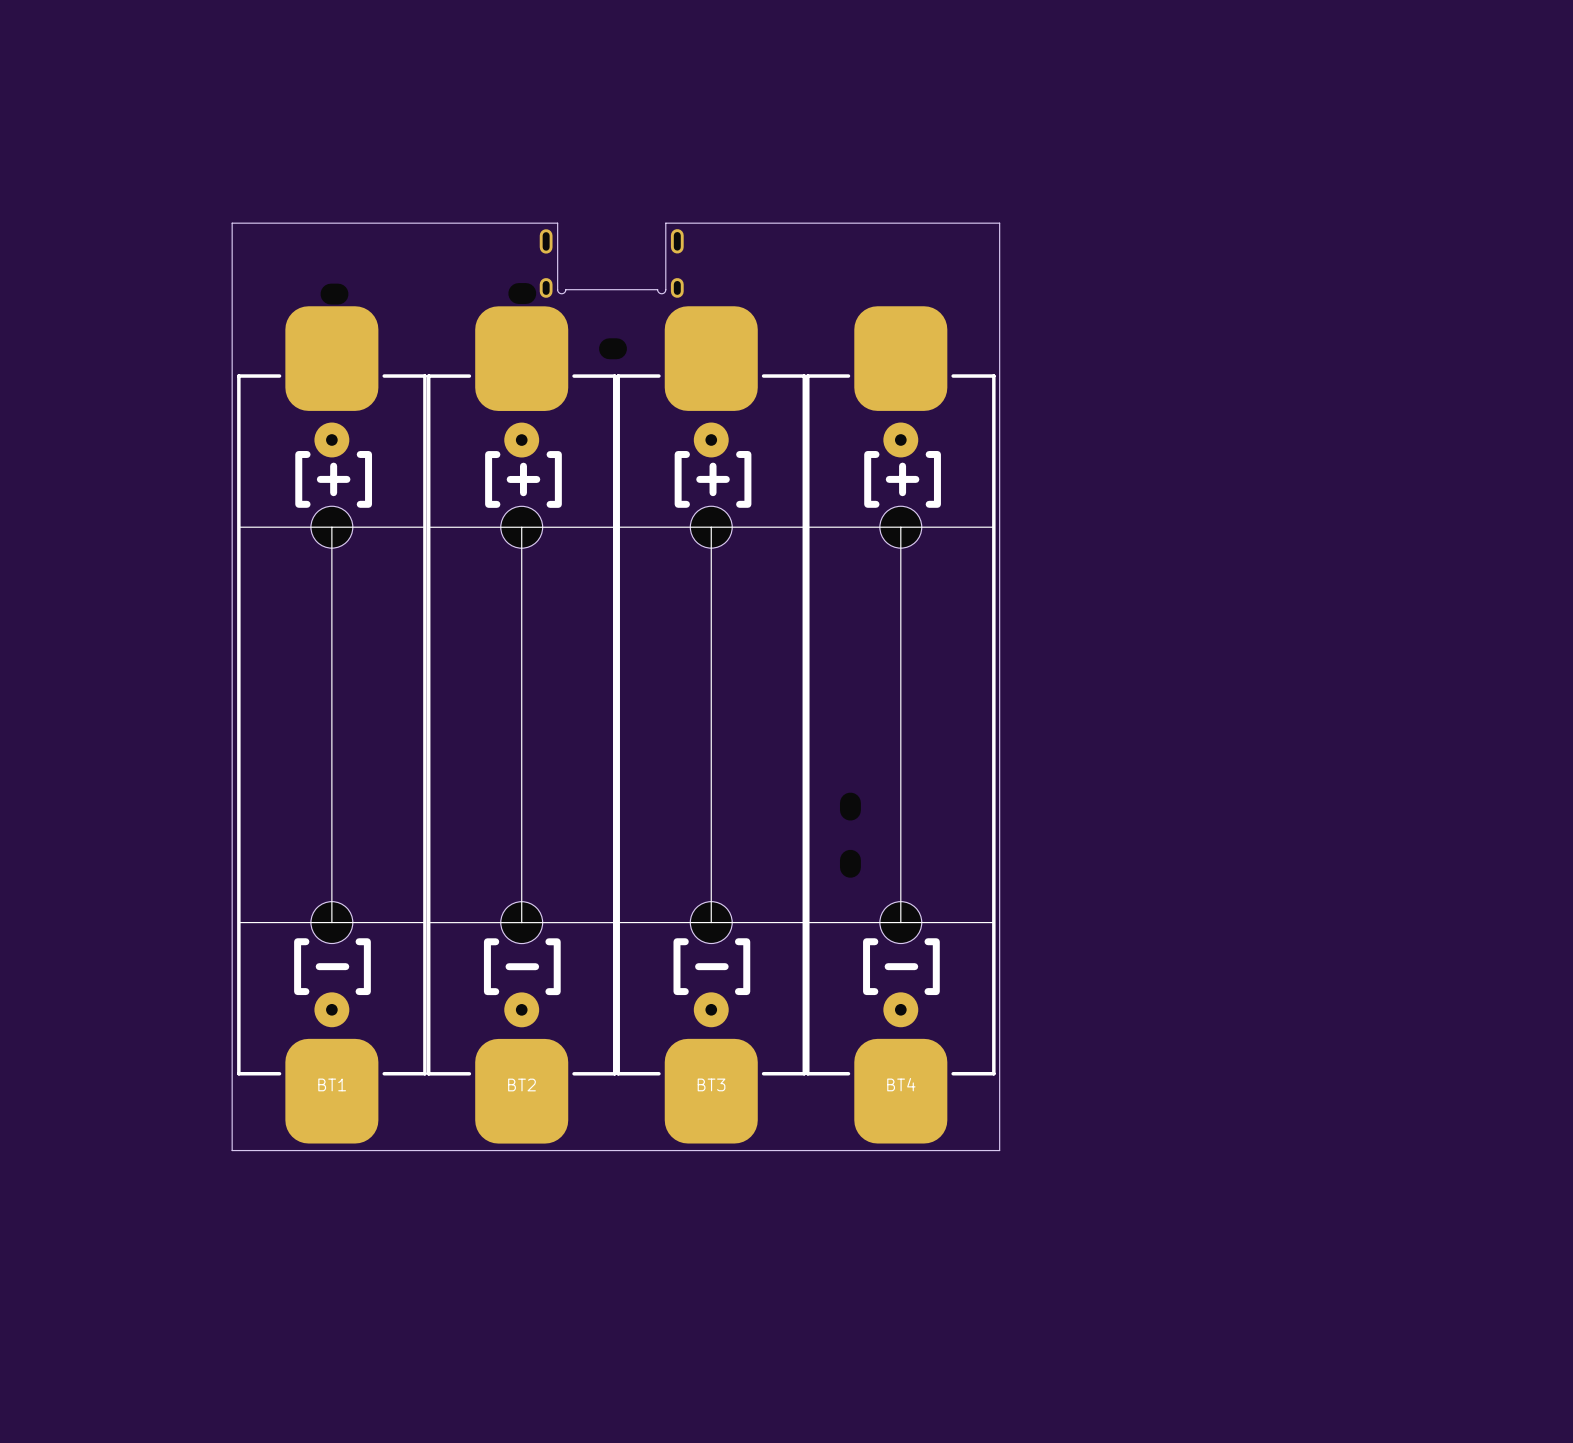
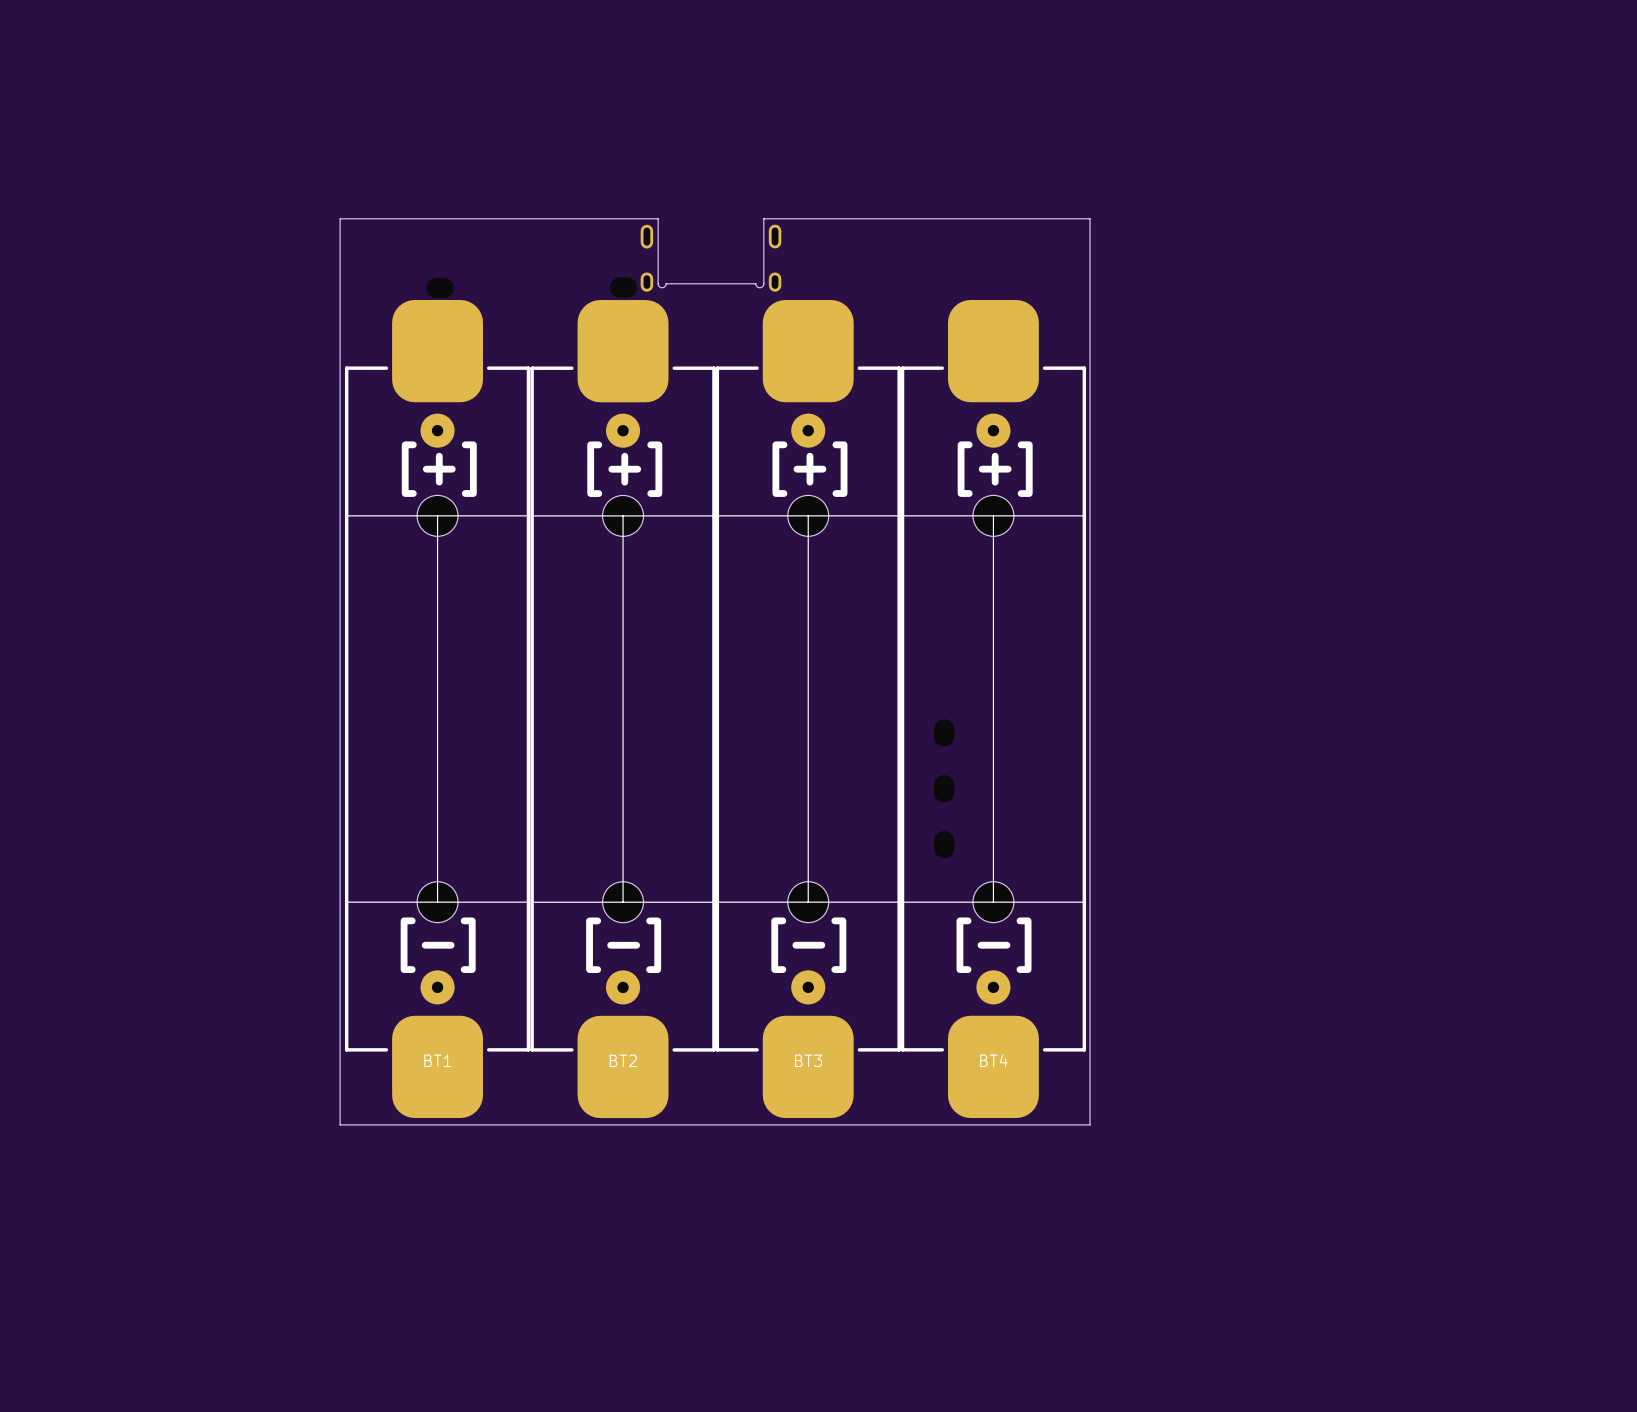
part: (613, 348) -> none
part: none -> (944, 732)

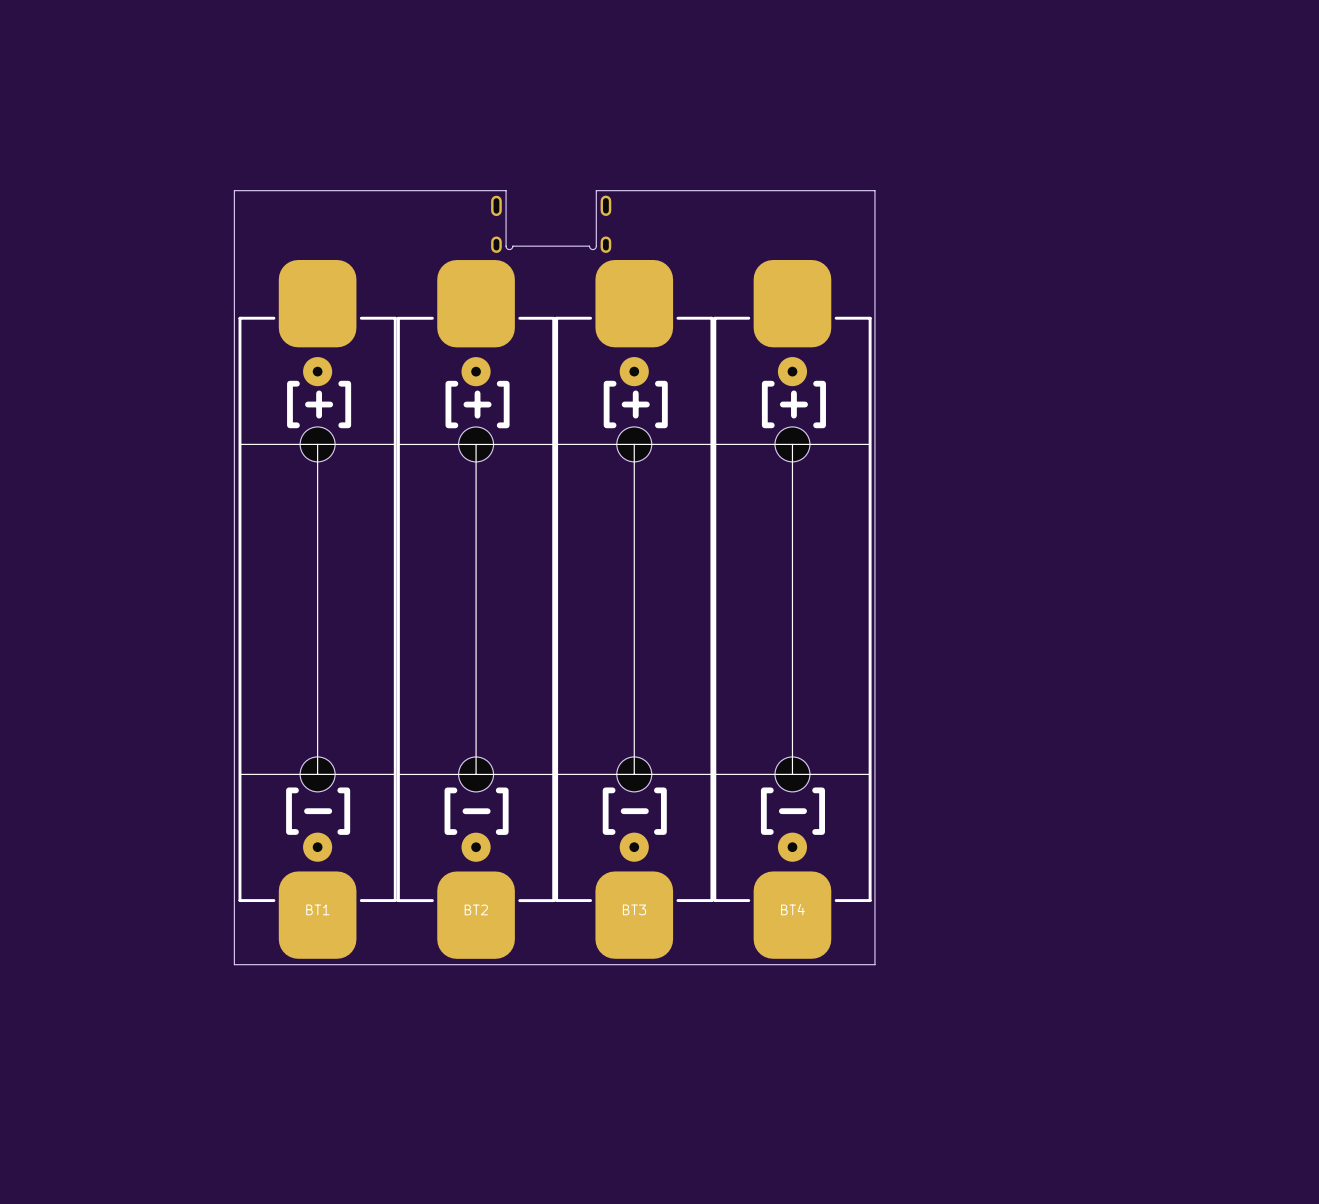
part: (623, 287) -> none
part: (440, 288) -> none
part: (944, 732) -> none
part: (944, 788) -> none
part: (944, 844) -> none

